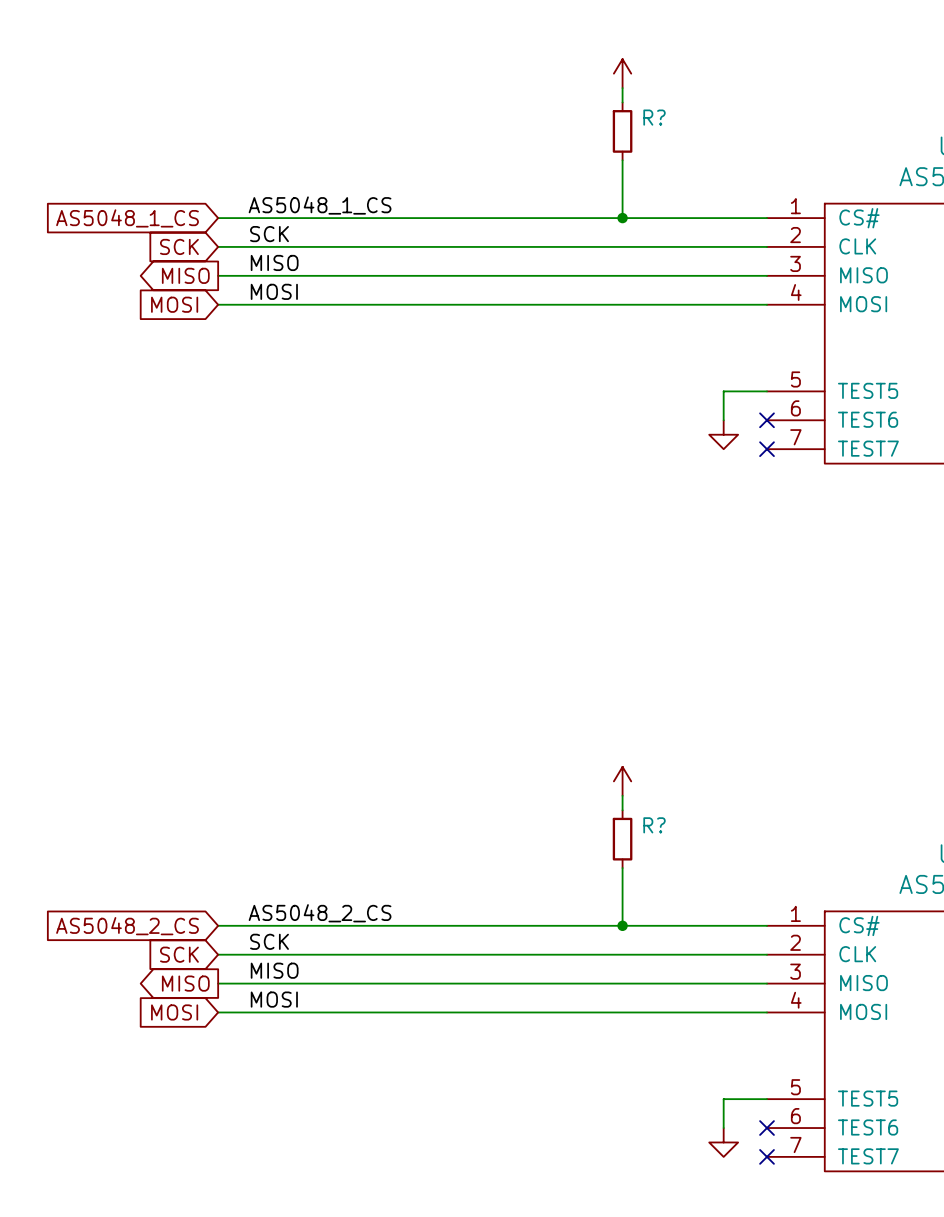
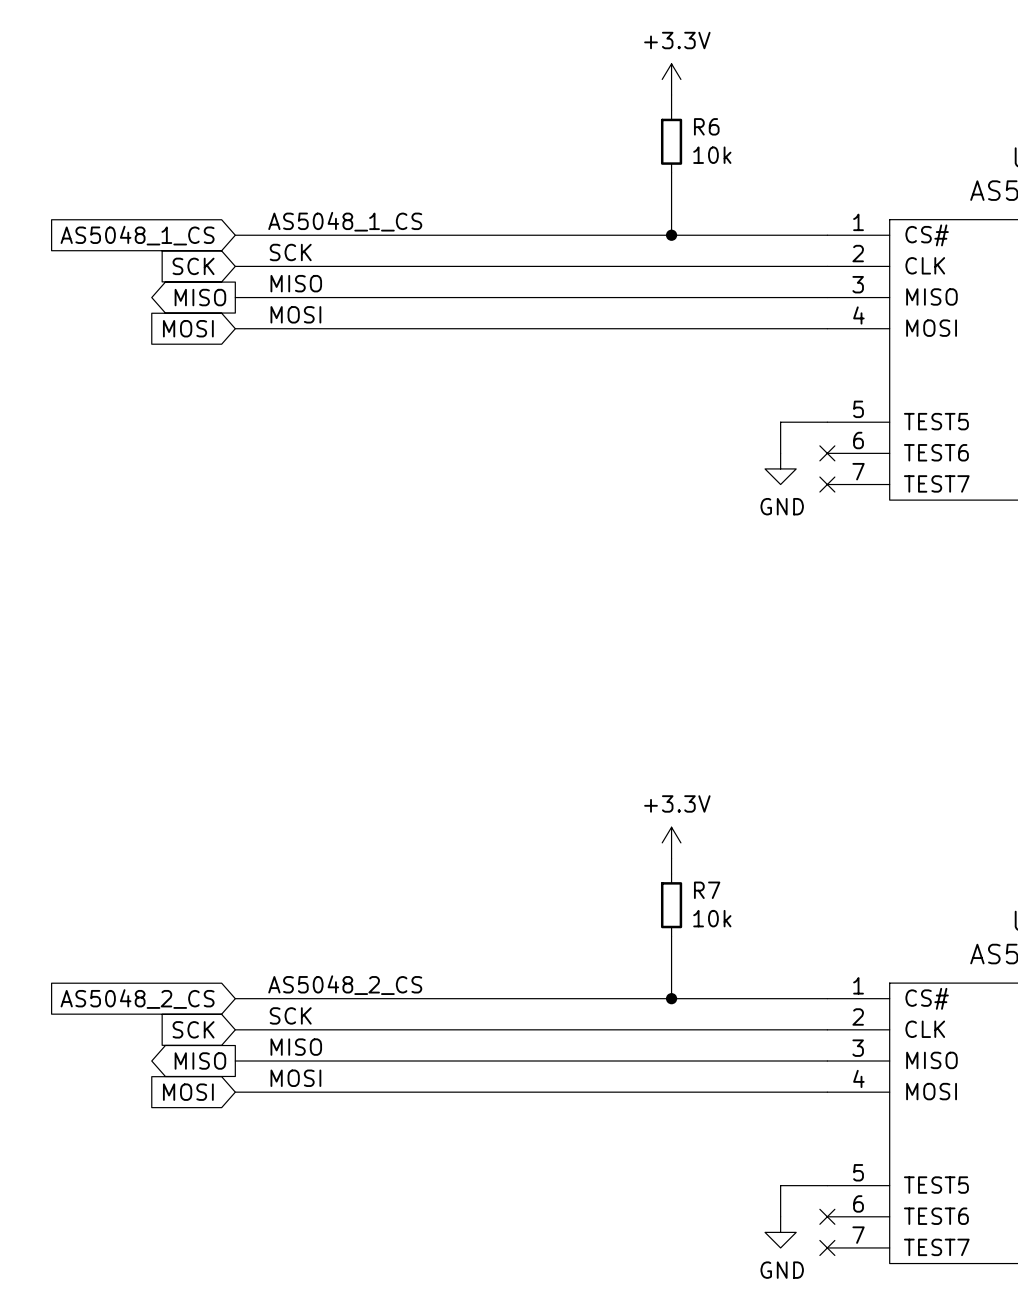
power symbol text: none -> +3.3V (677, 40)
R? name: R? (654, 117) -> R6 (706, 126)
R? value: none -> 10k (712, 155)
power symbol text: none -> GND (782, 506)
power symbol text: none -> +3.3V (677, 803)
R? name: R? (654, 825) -> R7 (707, 890)
R? value: none -> 10k (712, 918)
power symbol text: none -> GND (782, 1270)

